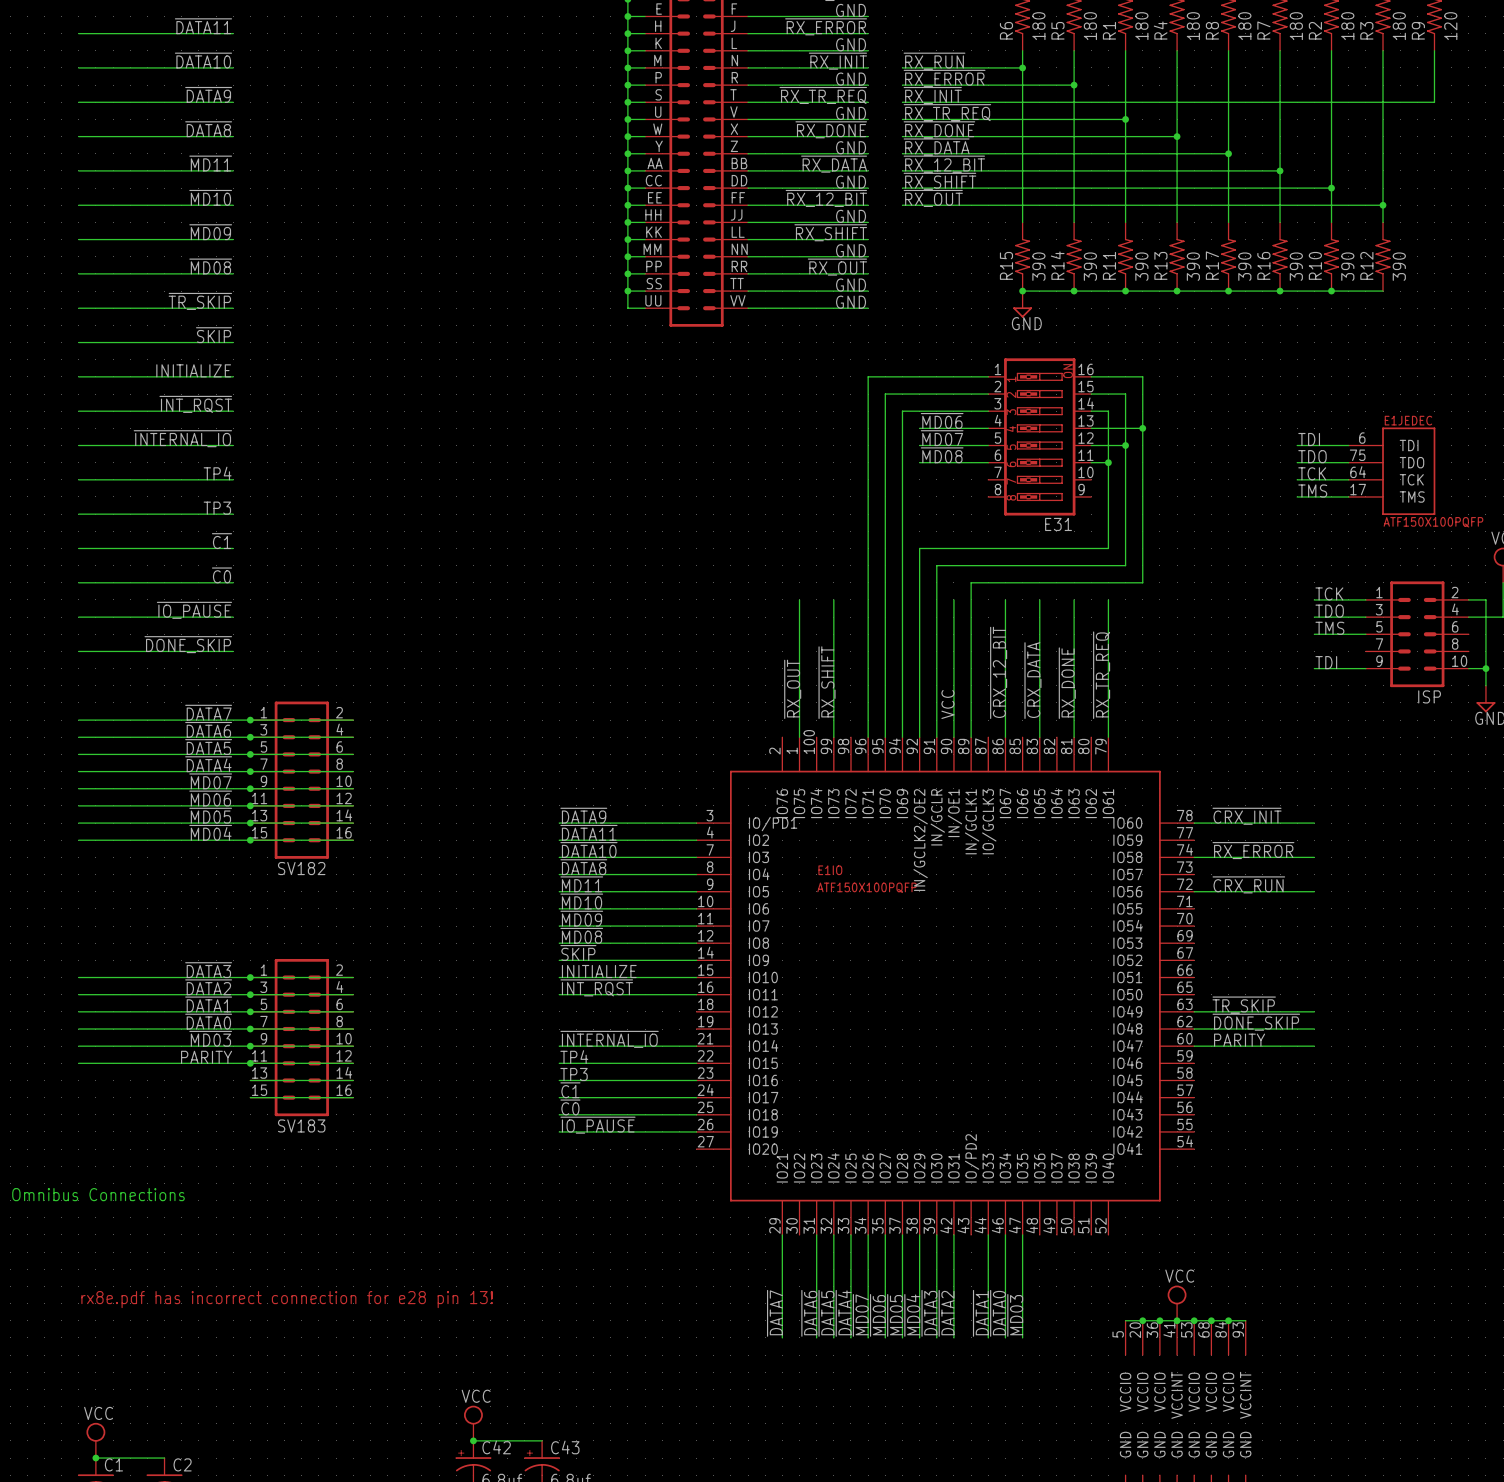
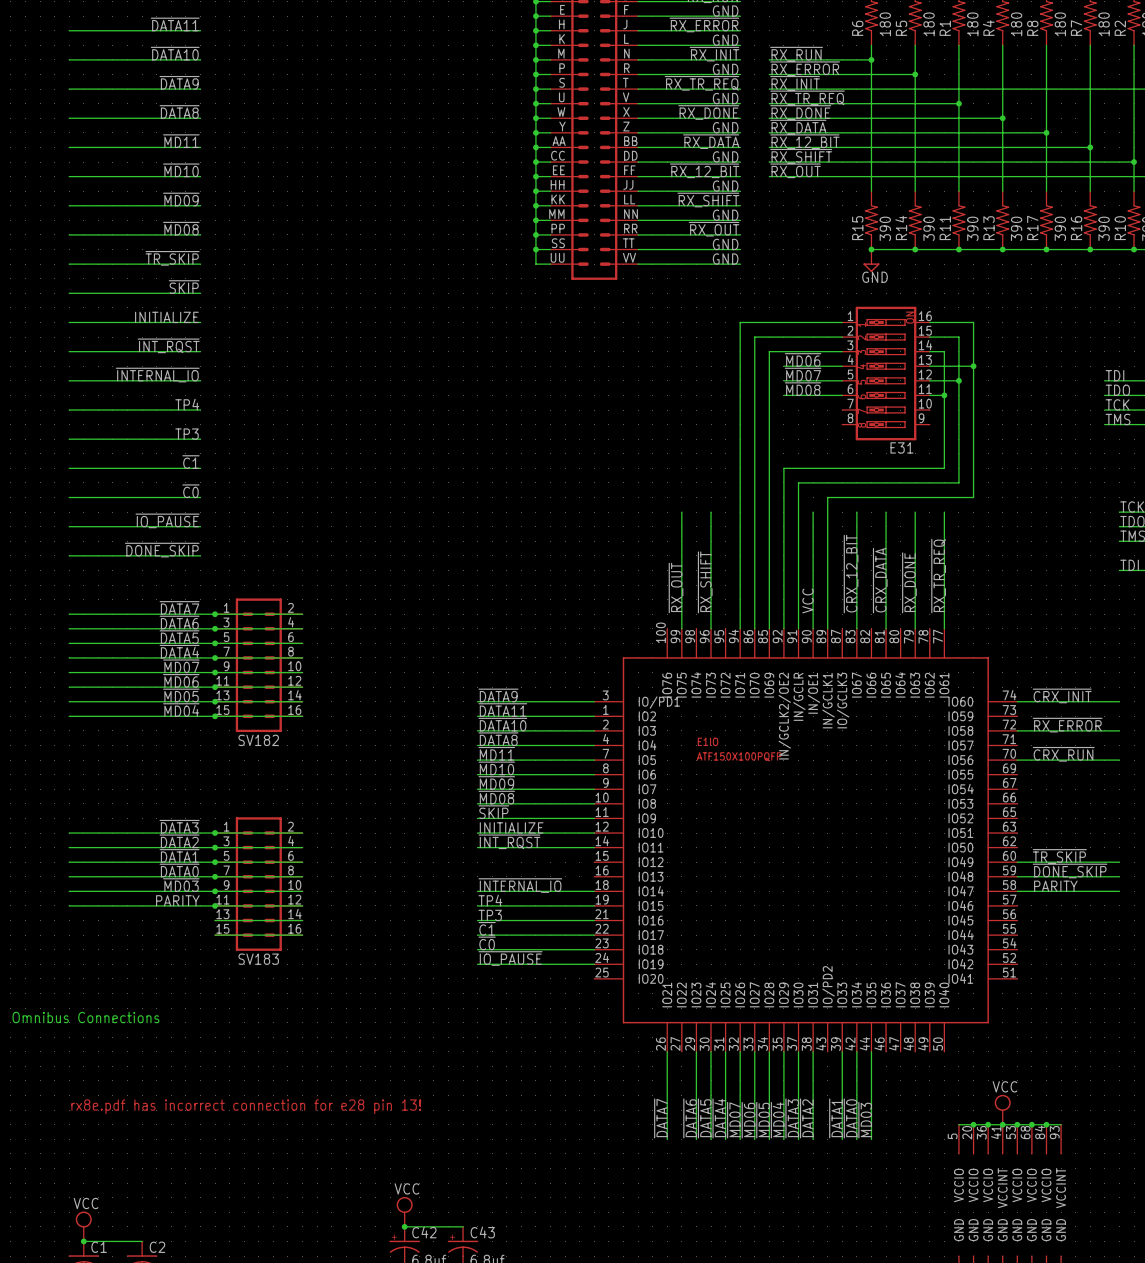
E1IO symbol: [696, 737, 1195, 1235] -> [594, 628, 1018, 1052]

